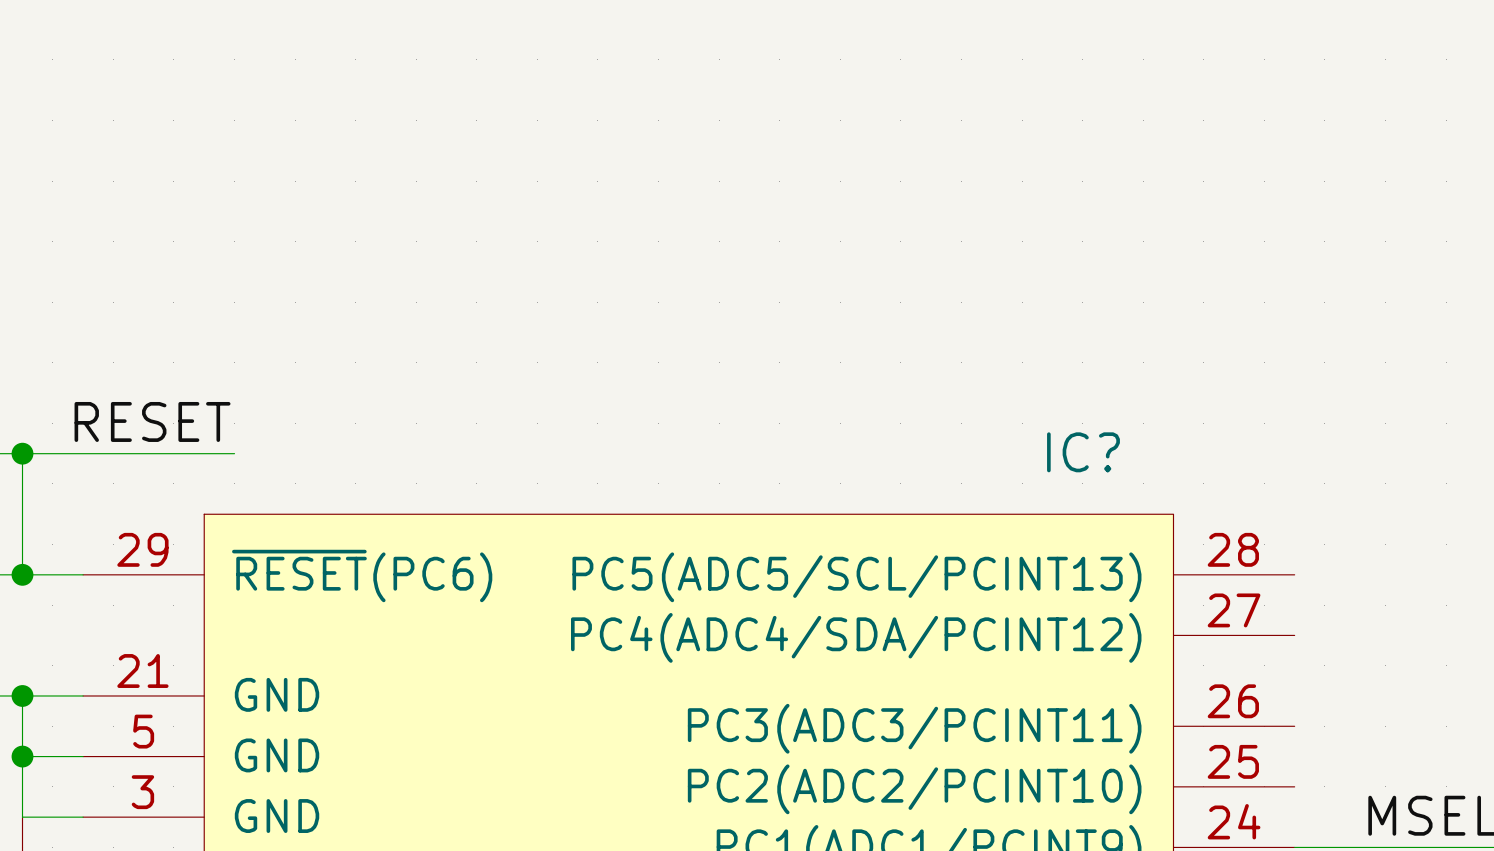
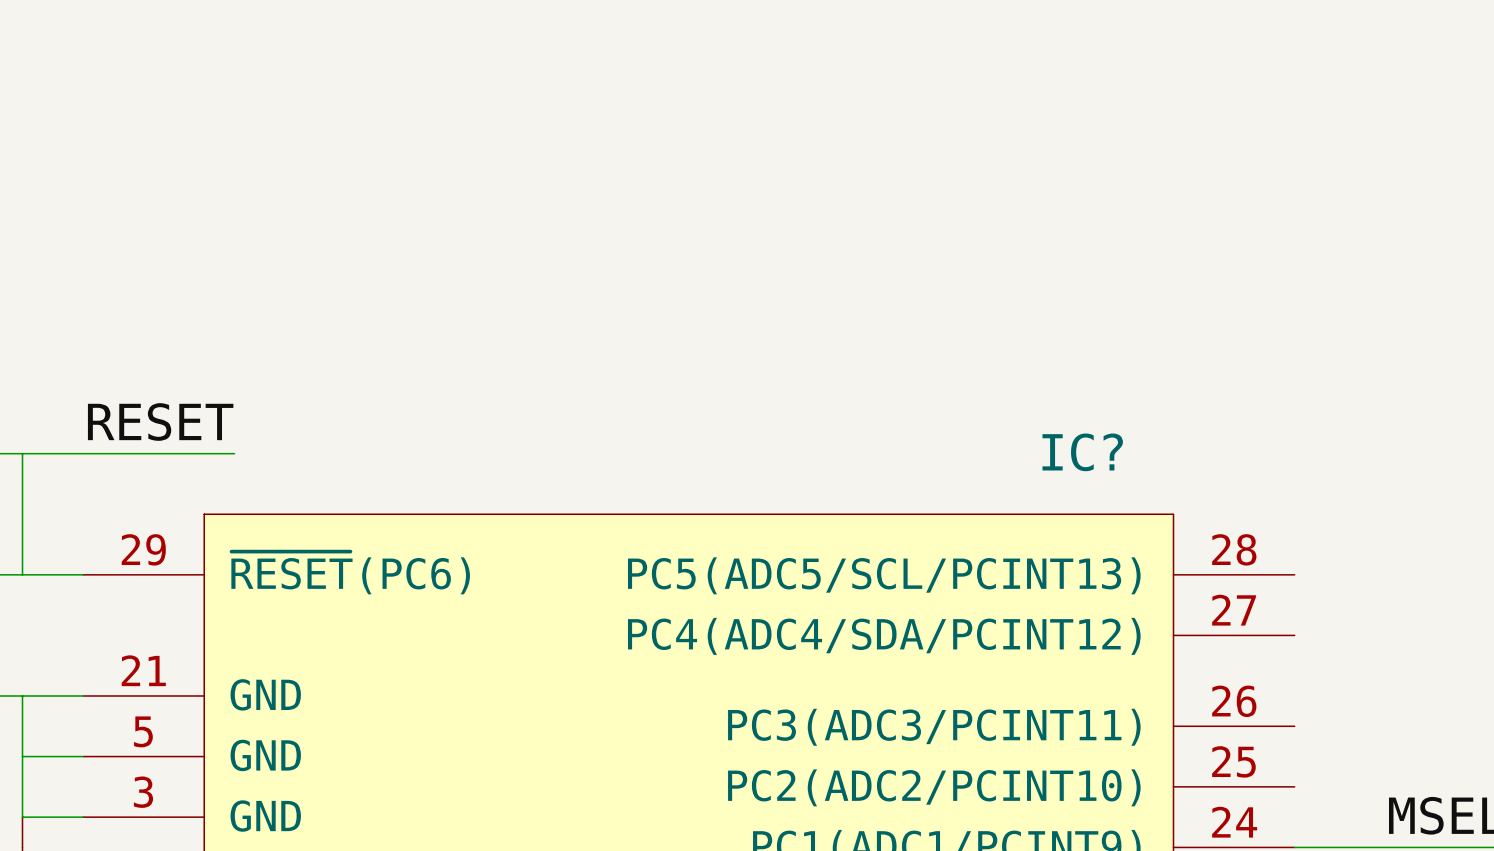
junction: (22, 453) -> none
junction: (22, 574) -> none
junction: (22, 695) -> none
junction: (22, 756) -> none

